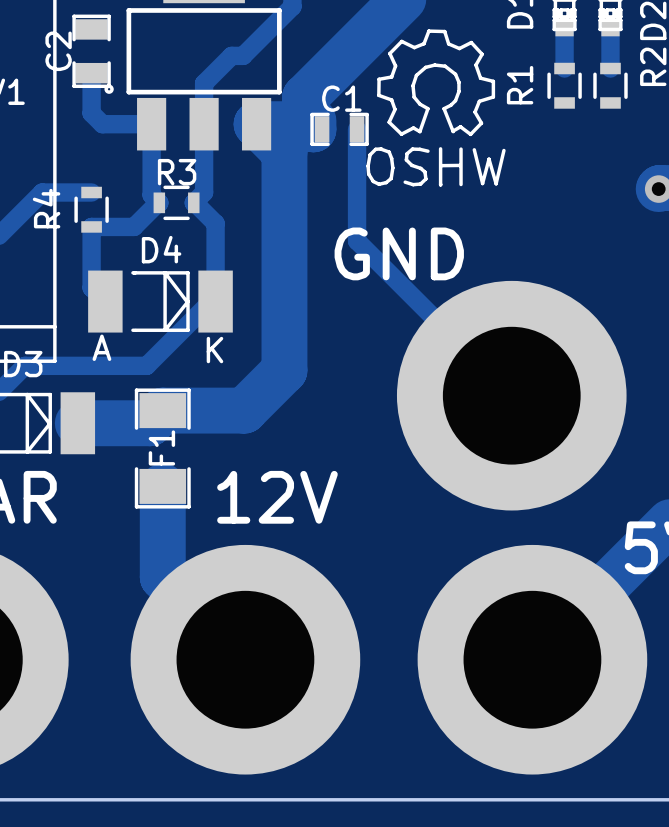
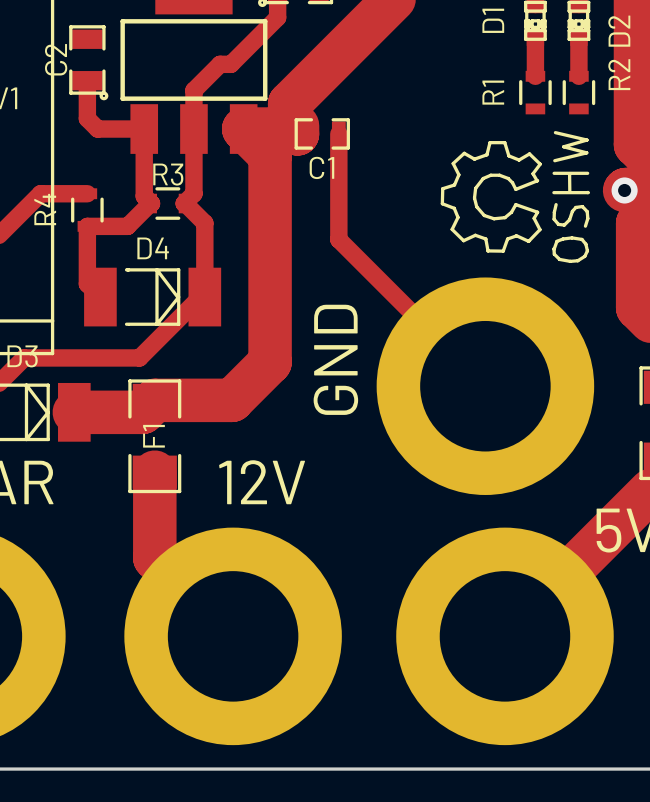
drawing: [366, 29, 506, 187] -> none
C1 name position: C1 (341, 98) -> C1 (321, 167)
drawing: none -> [440, 131, 590, 264]
text rotation: 0° (399, 253) -> 90° counterclockwise (335, 359)
D4 text: A (101, 347) -> none
D4 text: K (214, 350) -> none

